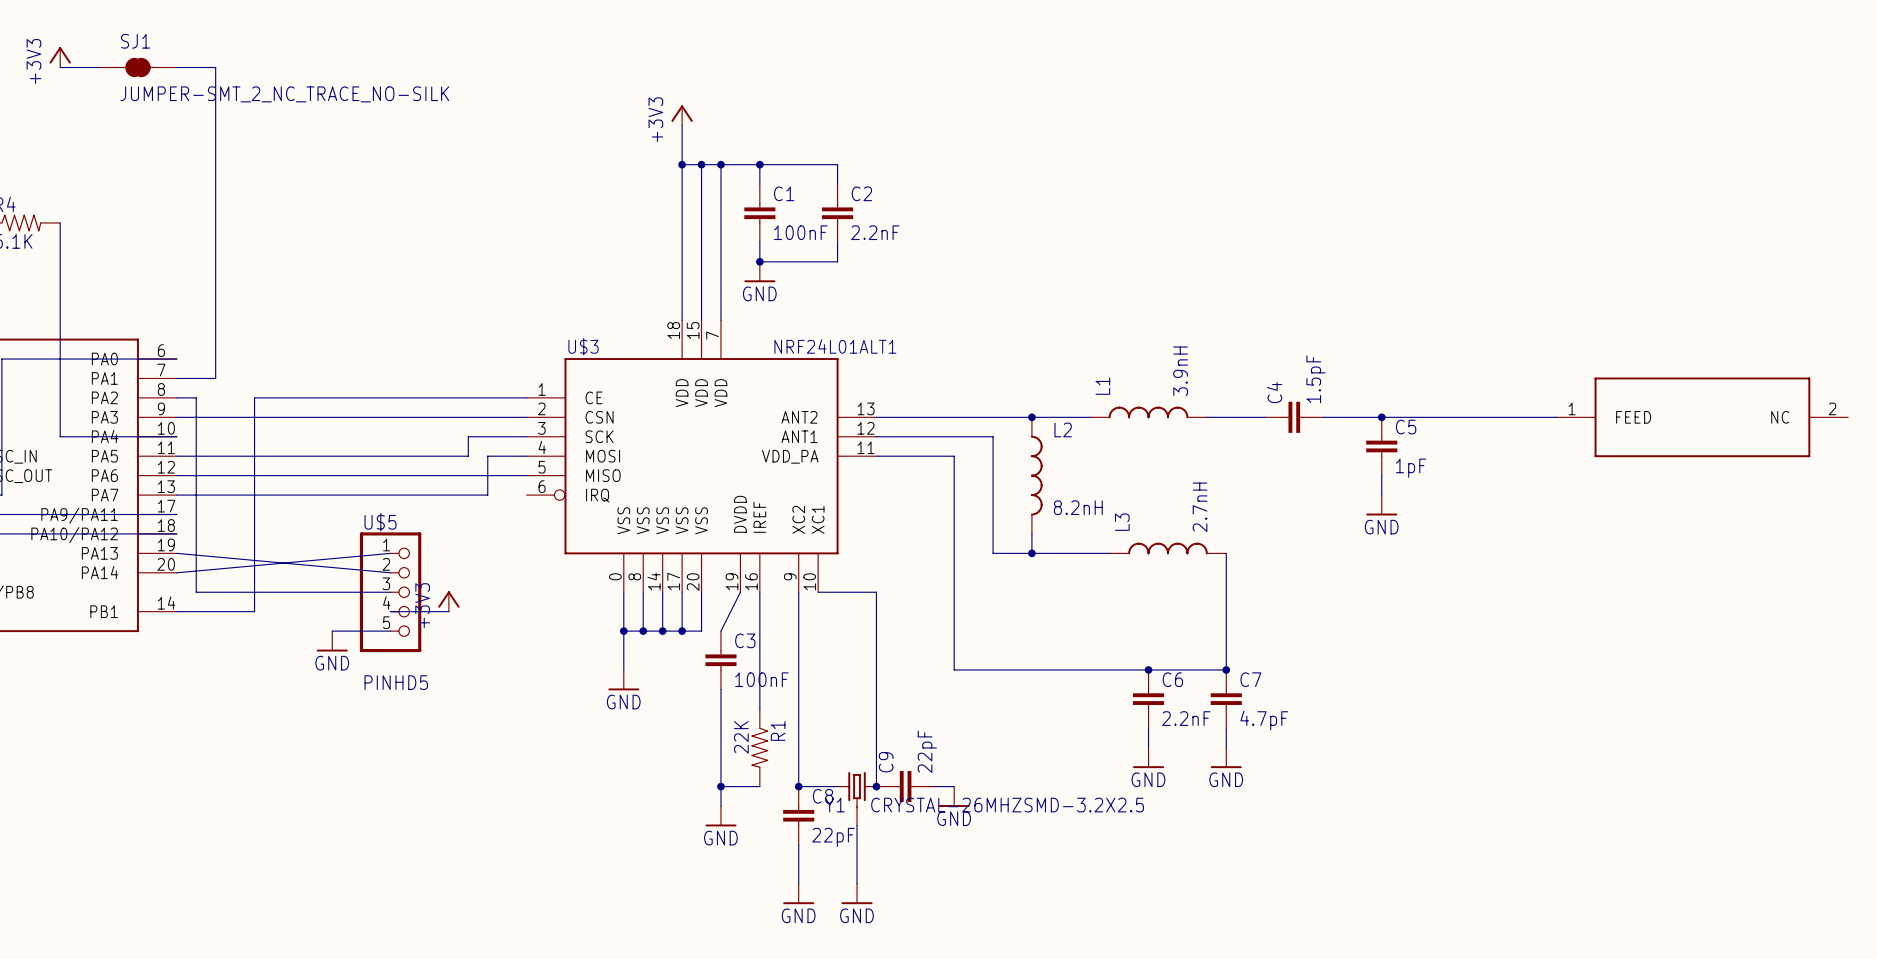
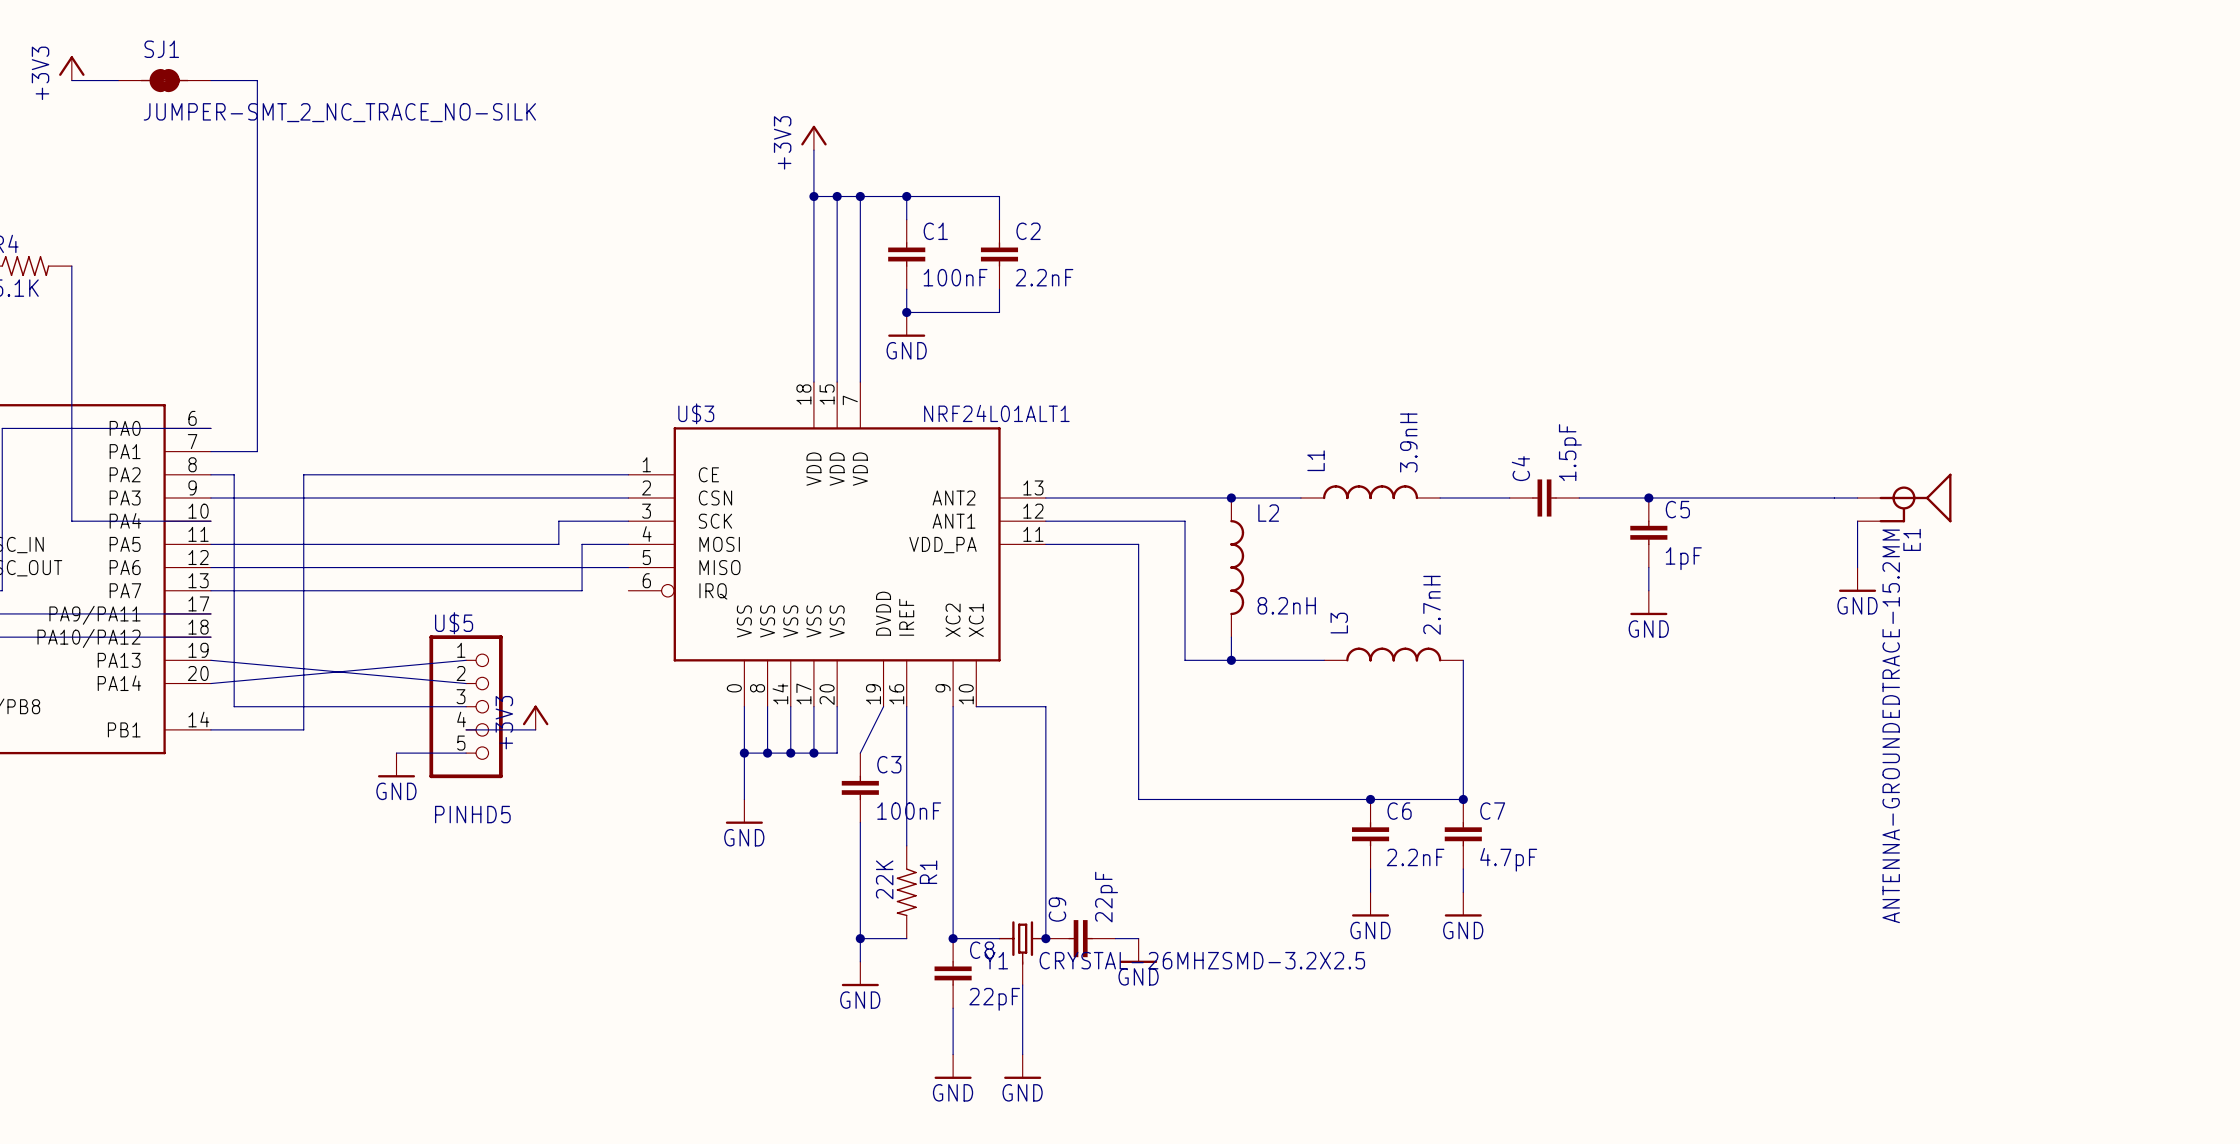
E1: none -> ANTENNA-GROUNDEDTRACE-15.2MM (1904, 497)
part: (1702, 417) -> none
wire: none -> (1857, 521) (1857, 567)
power symbol: none -> GND (1857, 579)

